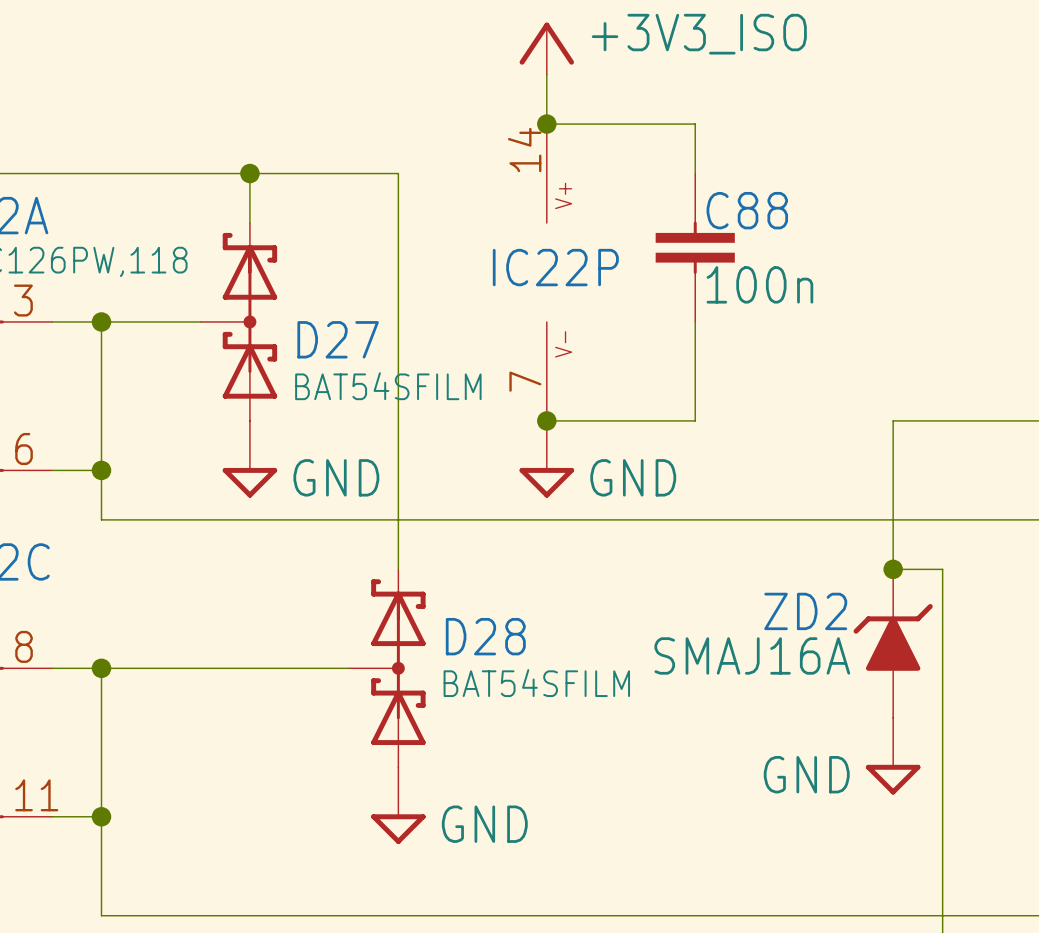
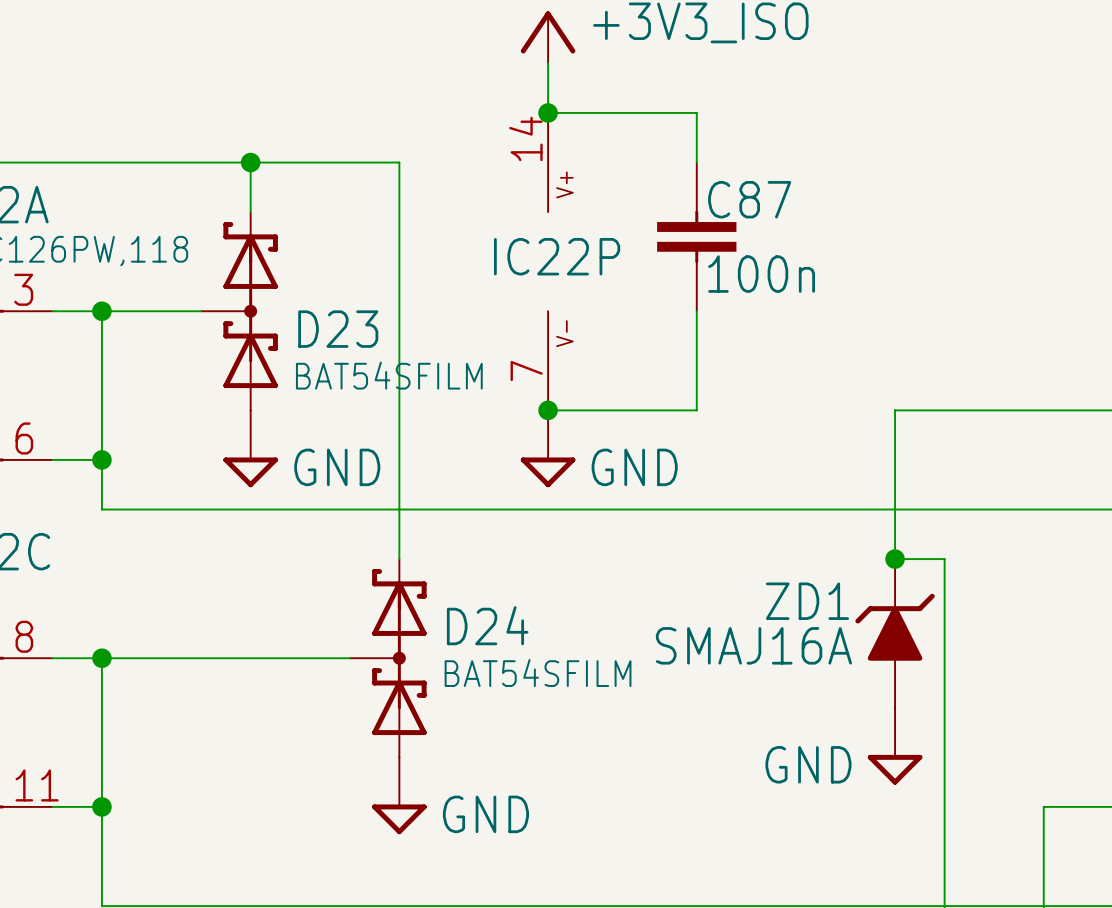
C88 name: C88 (747, 210) -> C87 (749, 199)
D27 name: D27 (338, 339) -> D23 (338, 329)
ZD2 name: ZD2 (805, 611) -> ZD1 (807, 601)
D28 name: D28 (485, 636) -> D24 (487, 625)

